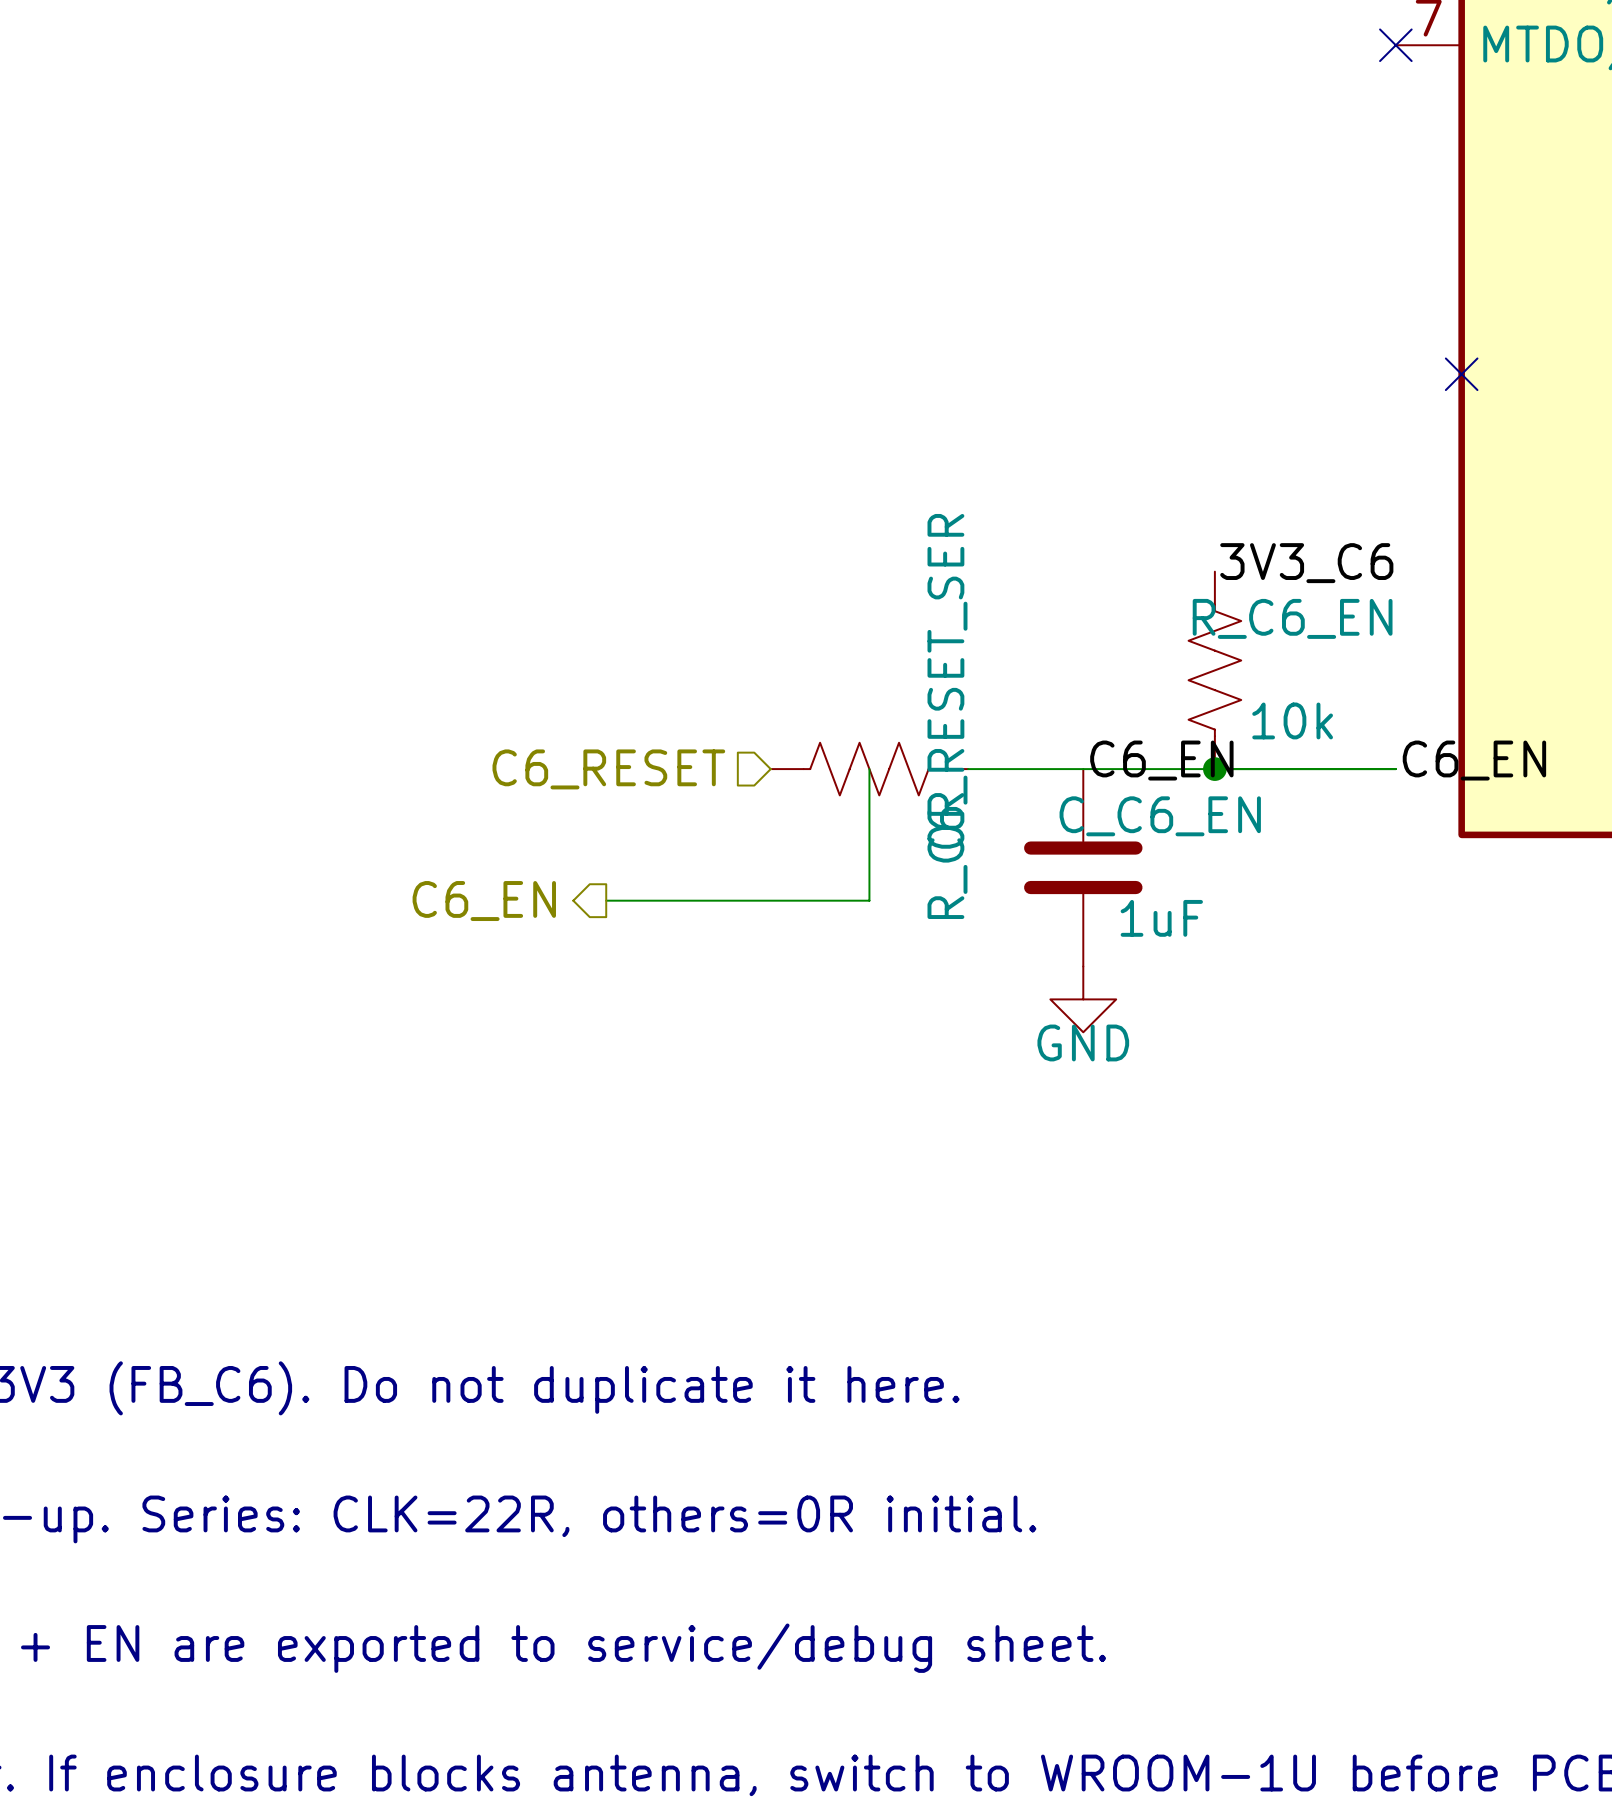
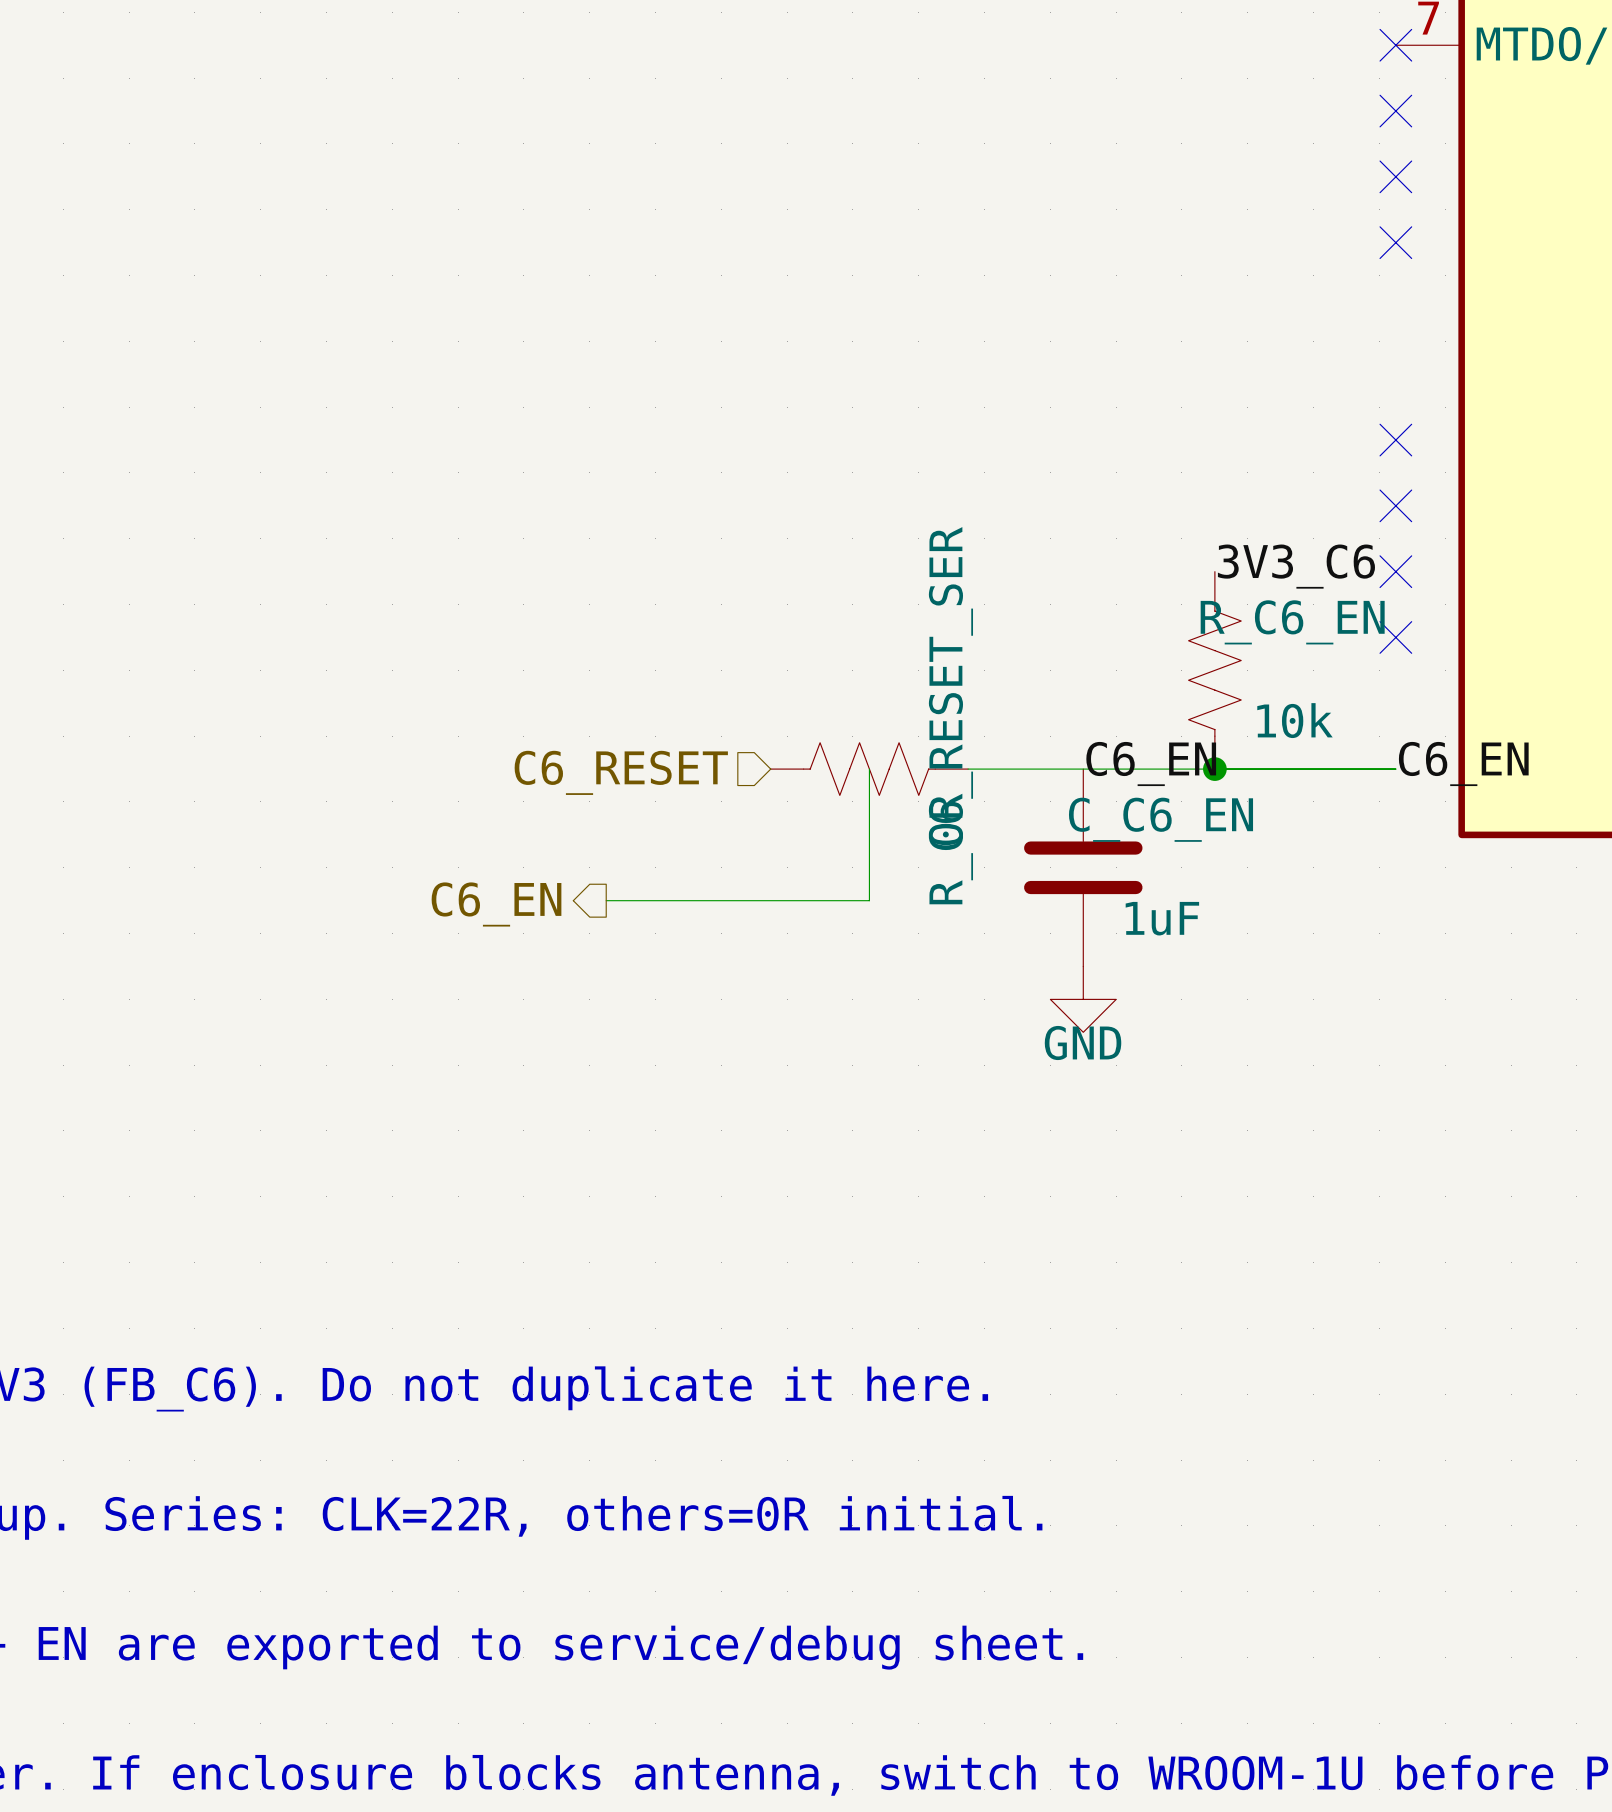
no-connect mark: none -> (1395, 111)
no-connect mark: none -> (1395, 176)
no-connect mark: none -> (1395, 242)
no-connect mark: (1461, 374) -> none
no-connect mark: none -> (1395, 440)
no-connect mark: none -> (1395, 505)
no-connect mark: none -> (1395, 571)
no-connect mark: none -> (1395, 637)

